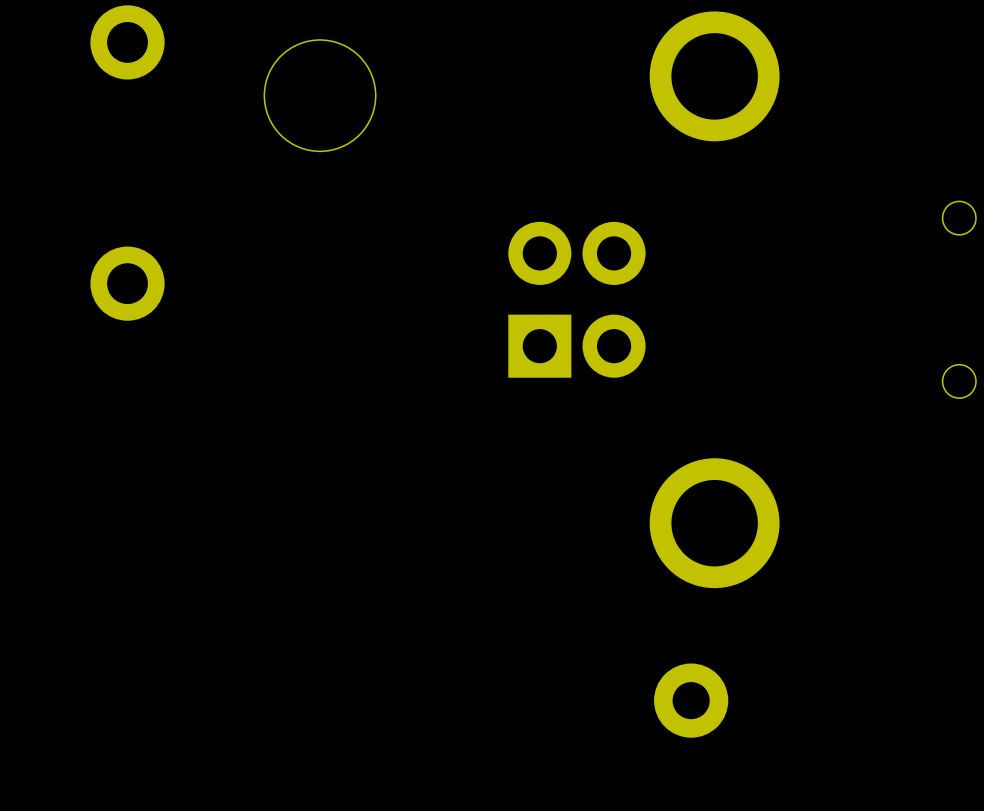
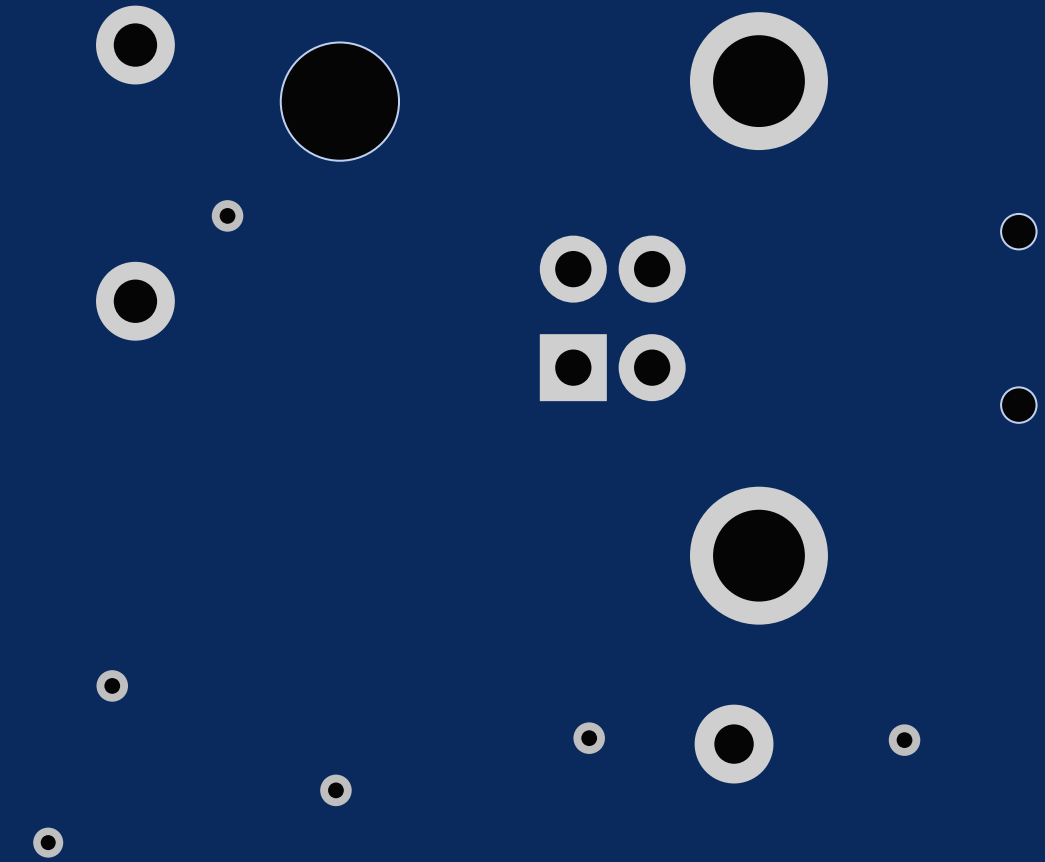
via: none -> (227, 215)
via: none -> (112, 685)
via: none -> (589, 738)
via: none -> (904, 740)
via: none -> (335, 790)
via: none -> (48, 842)

